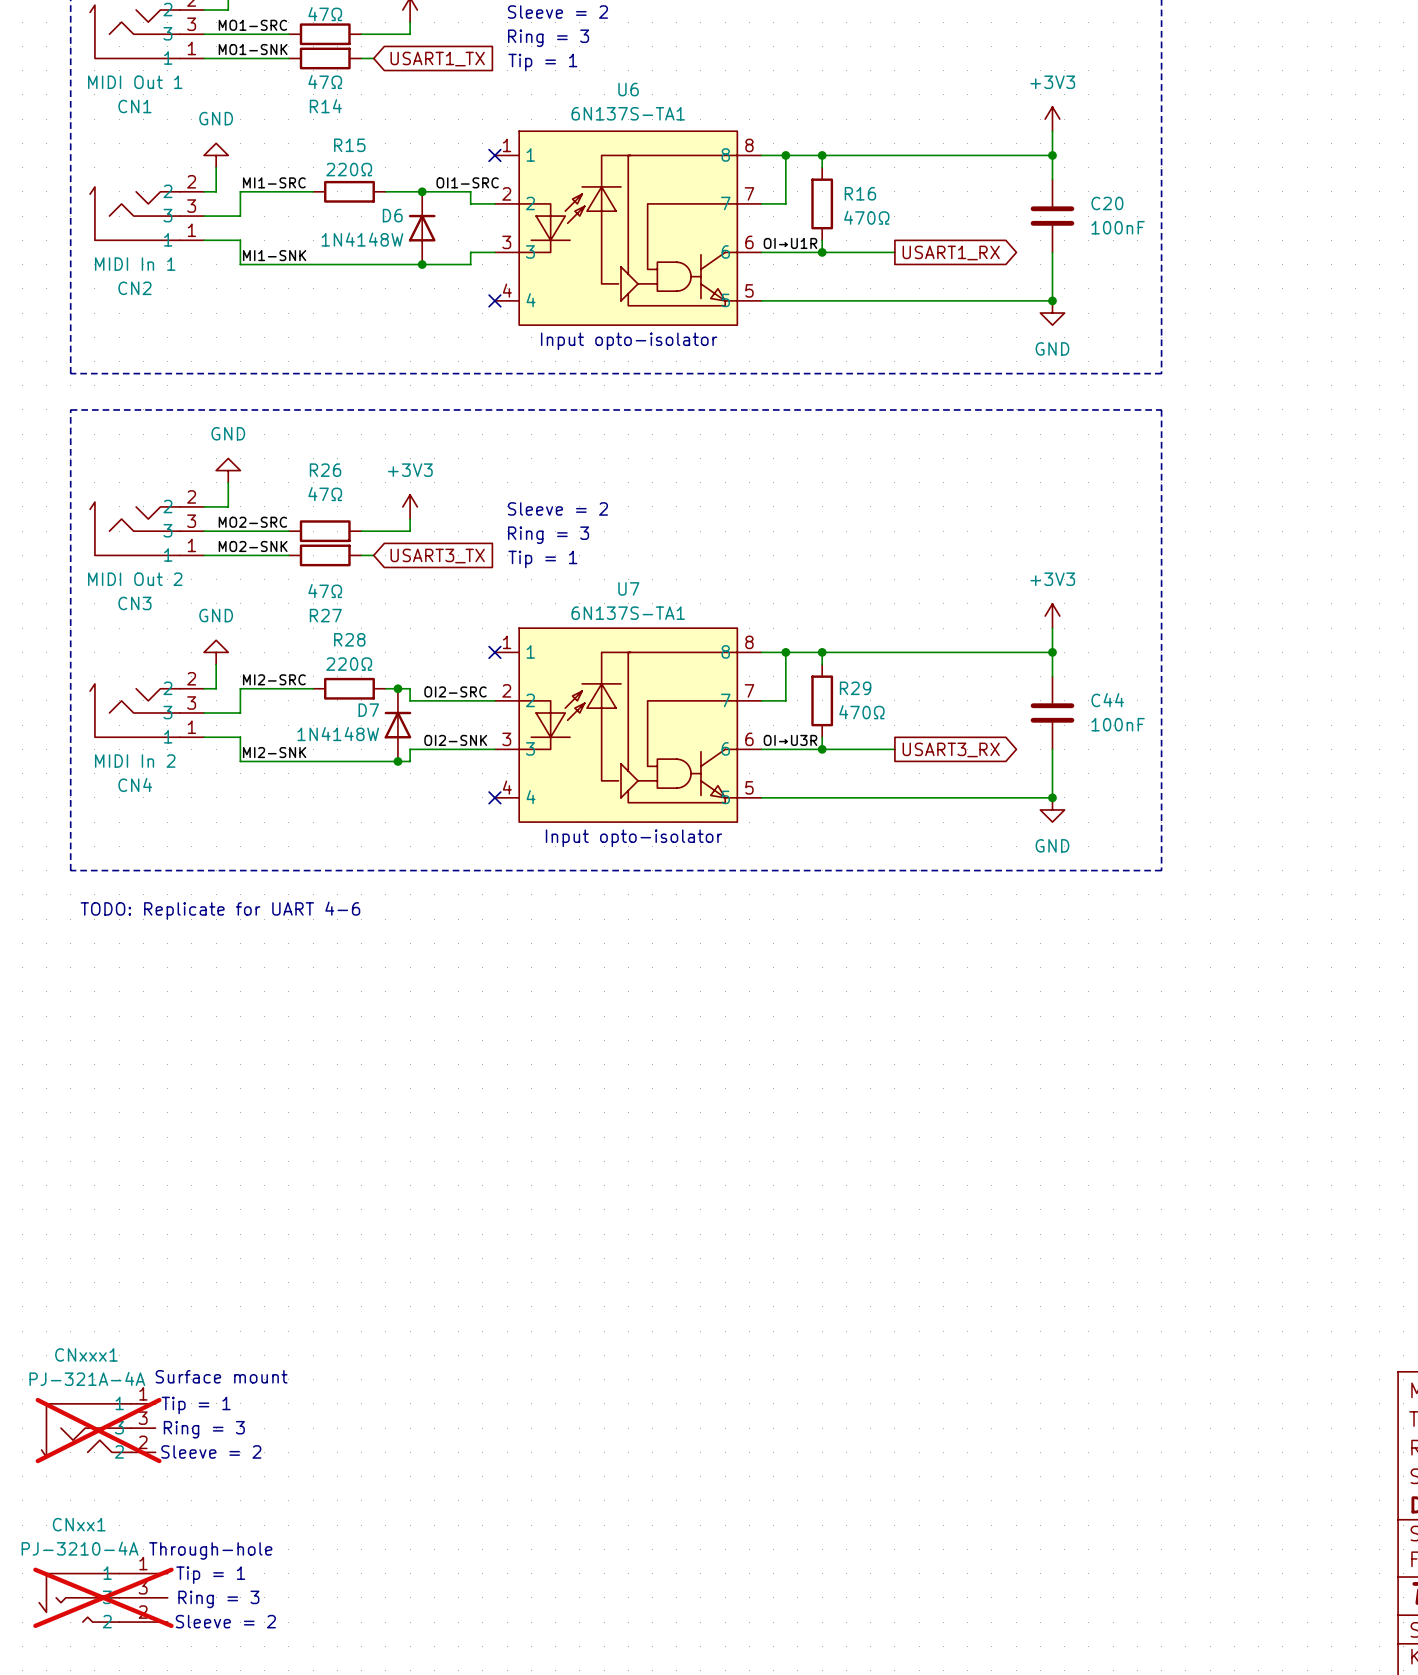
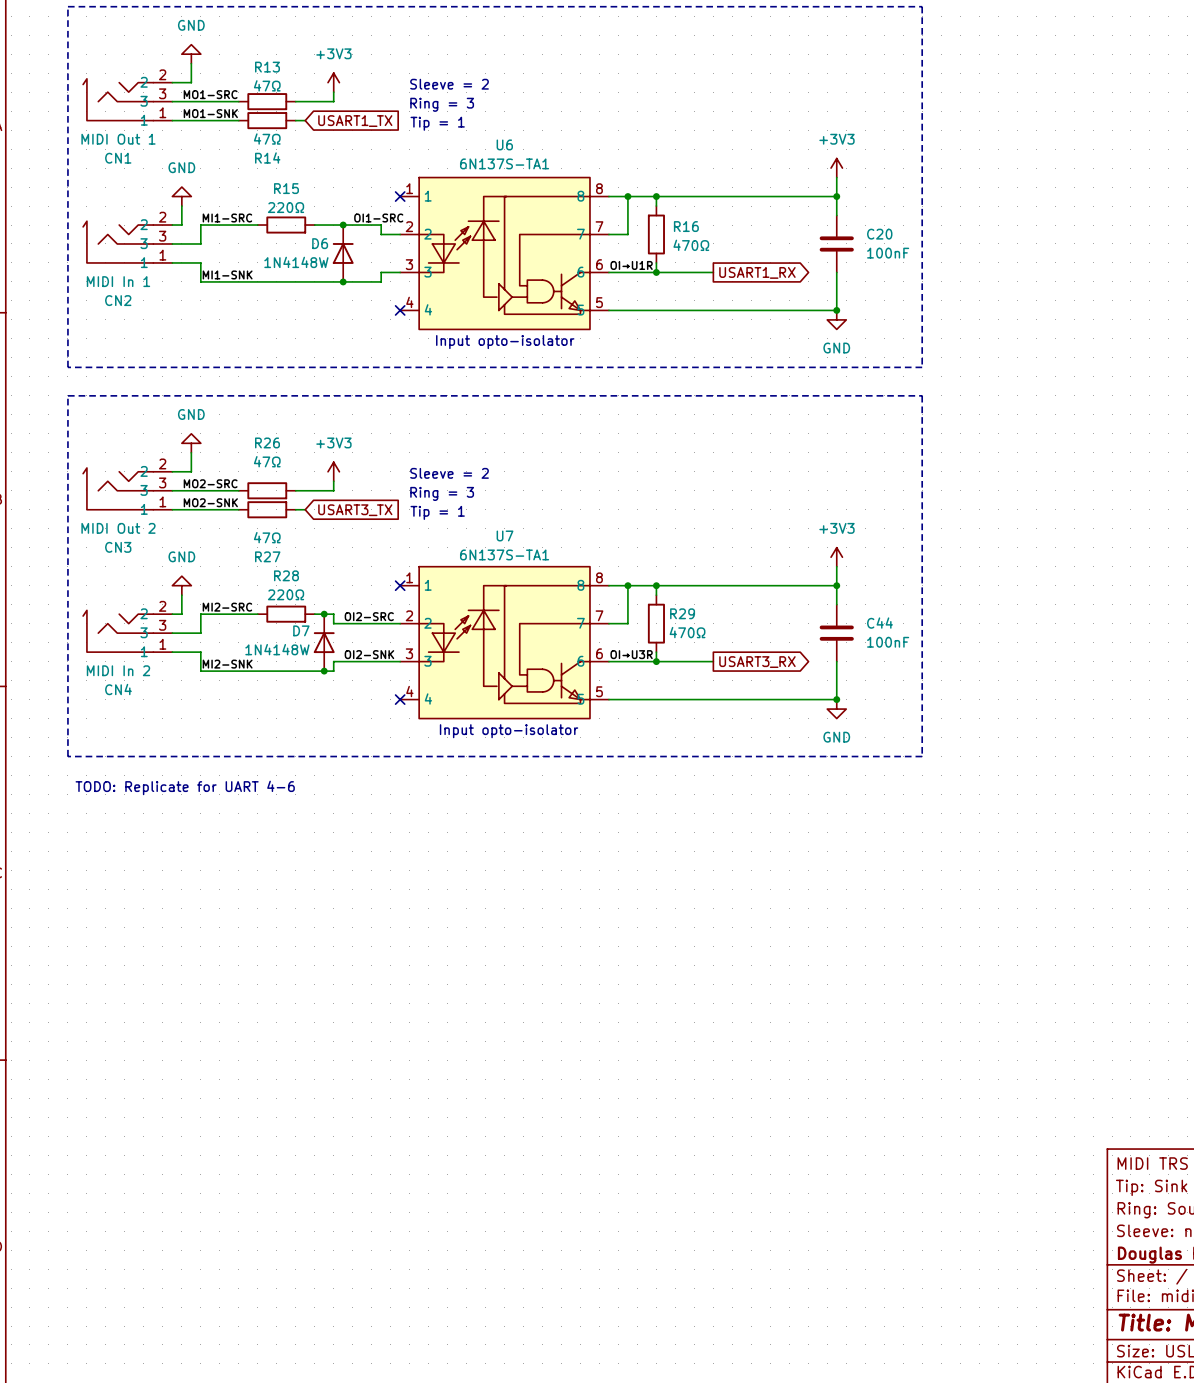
text: Surface mount (221, 1376) -> none
text: Tip = 1 (196, 1405) -> none
text: Ring = 3 (204, 1429) -> none
CNxxx1: PJ-321A-4A (98, 1430) -> none
text: Sleeve = 2 (211, 1451) -> none
text: Through-hole (210, 1550) -> none
text: Tip = 1 (210, 1575) -> none
CNxx1: PJ-3210-4A (103, 1597) -> none
text: Ring = 3 (218, 1599) -> none
text: Sleeve = 2 (225, 1621) -> none

